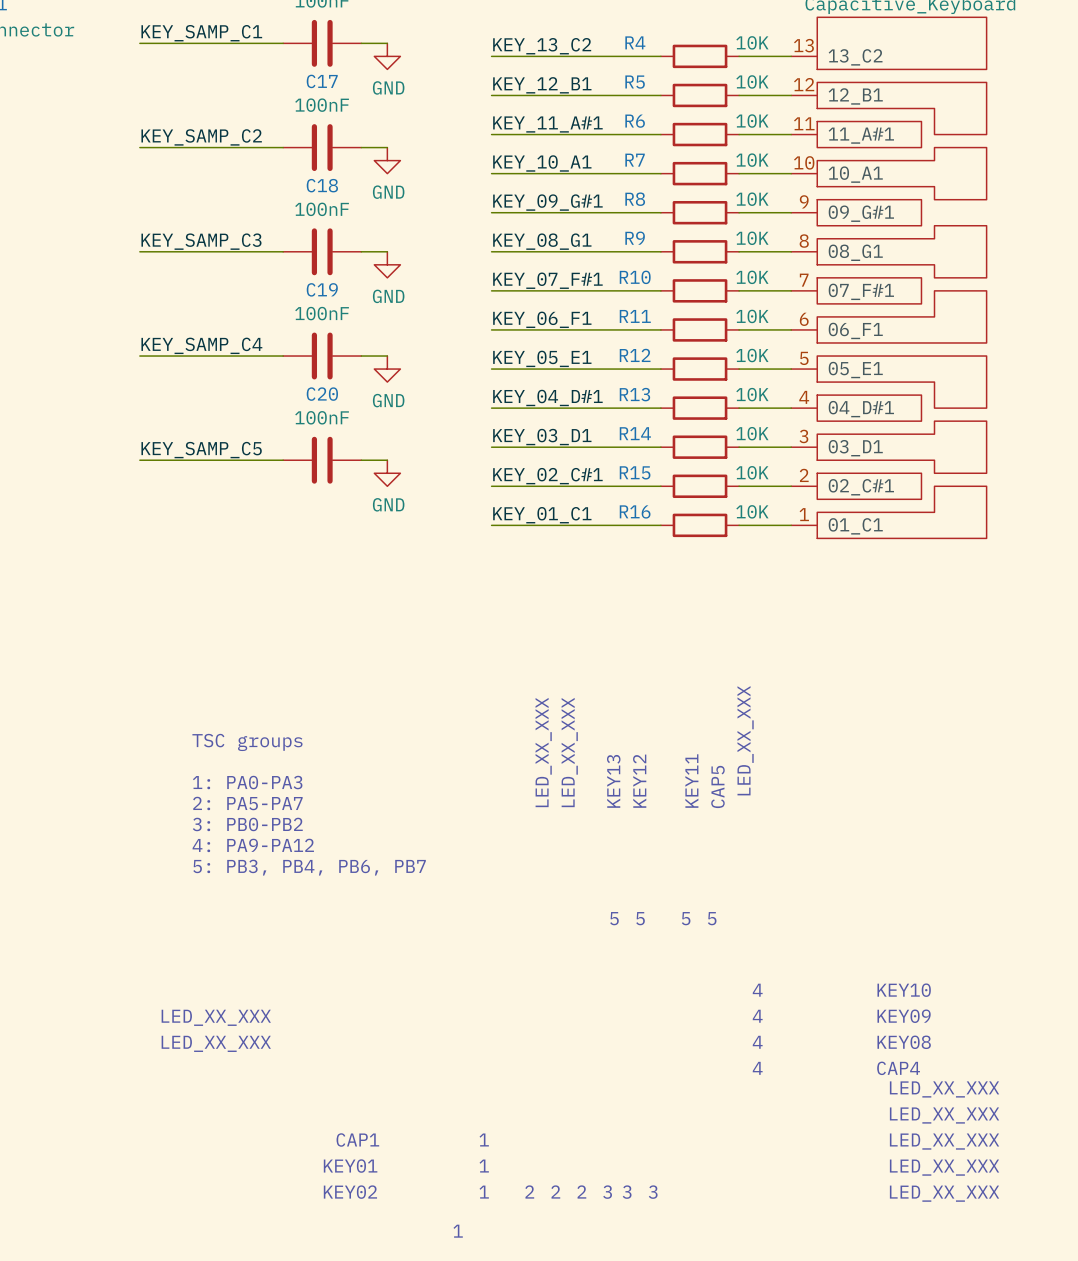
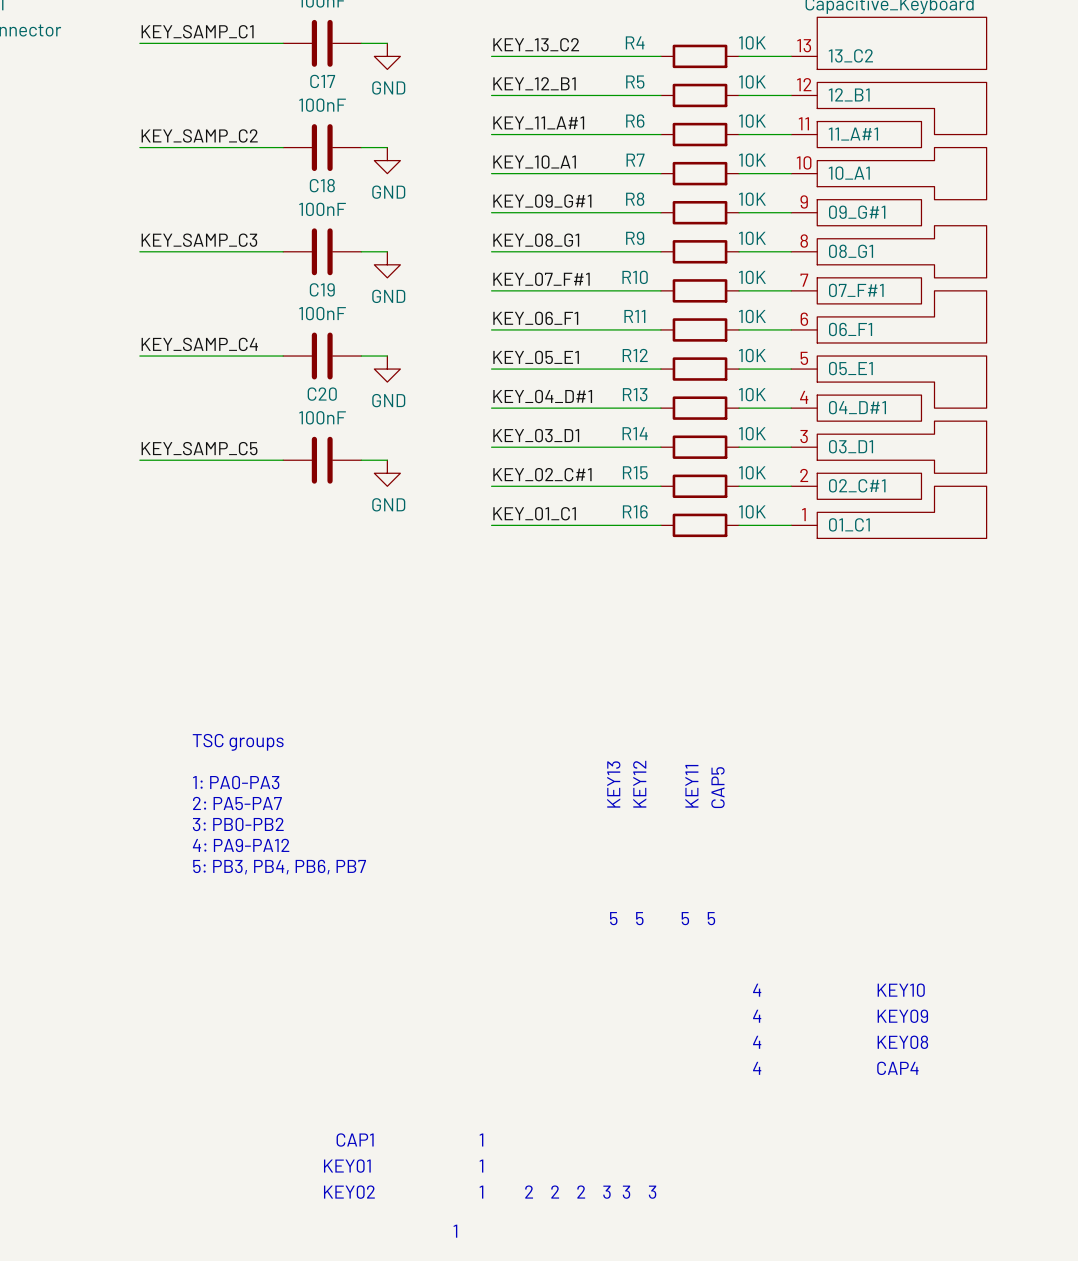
text: LED_XX_XXX (745, 740) -> none
text: LED_XX_XXX (543, 752) -> none
text: LED_XX_XXX (569, 752) -> none
text: LED_XX_XXX (216, 1017) -> none
text: LED_XX_XXX (216, 1043) -> none
text: LED_XX_XXX (944, 1089) -> none
text: LED_XX_XXX (944, 1115) -> none
text: LED_XX_XXX (944, 1141) -> none
text: LED_XX_XXX (944, 1167) -> none
text: LED_XX_XXX (944, 1193) -> none

